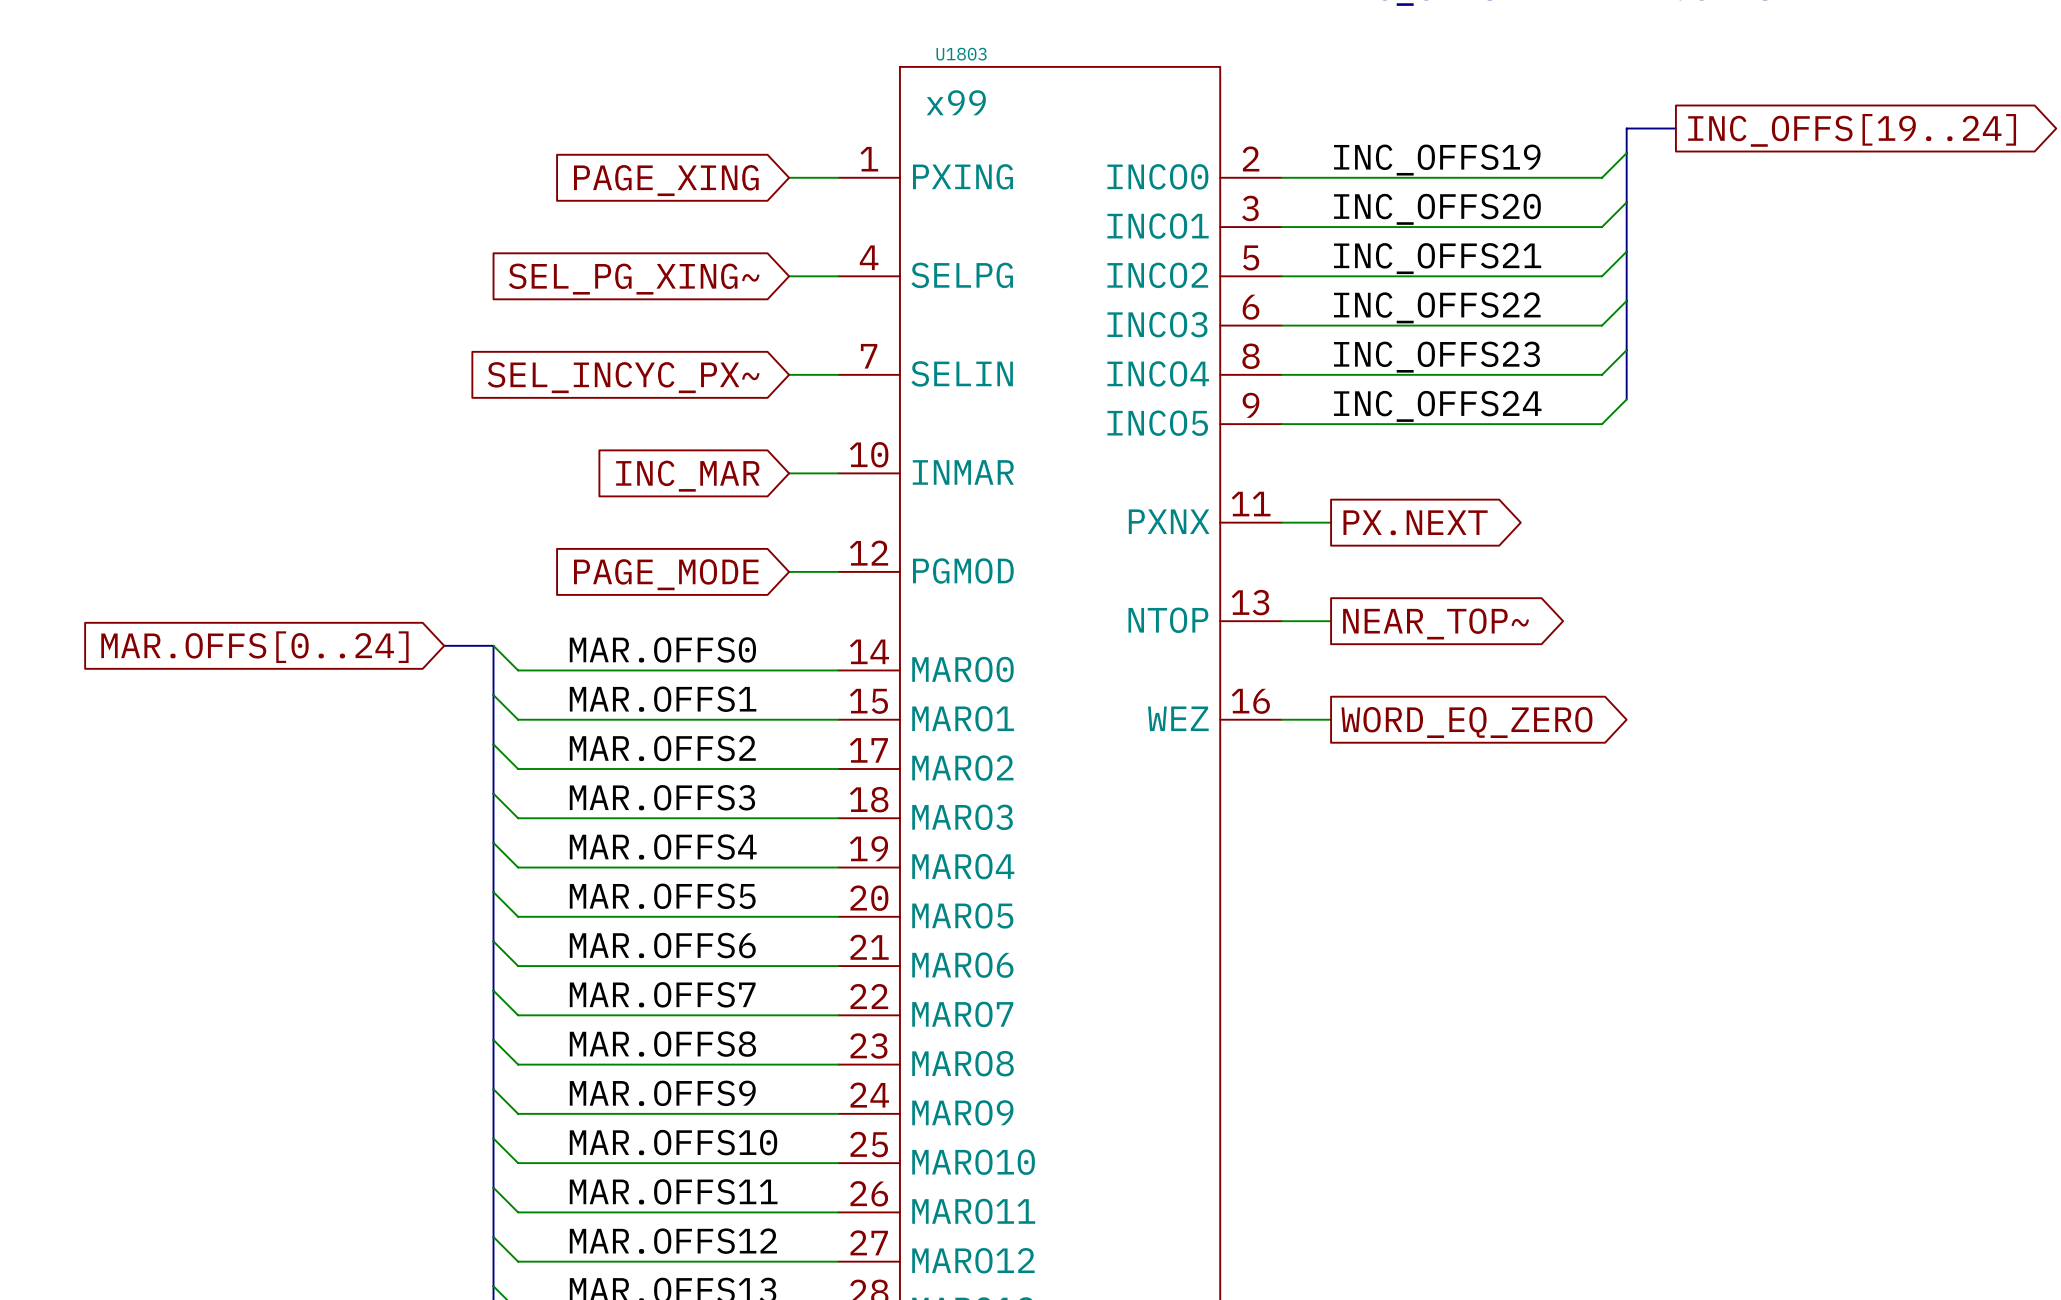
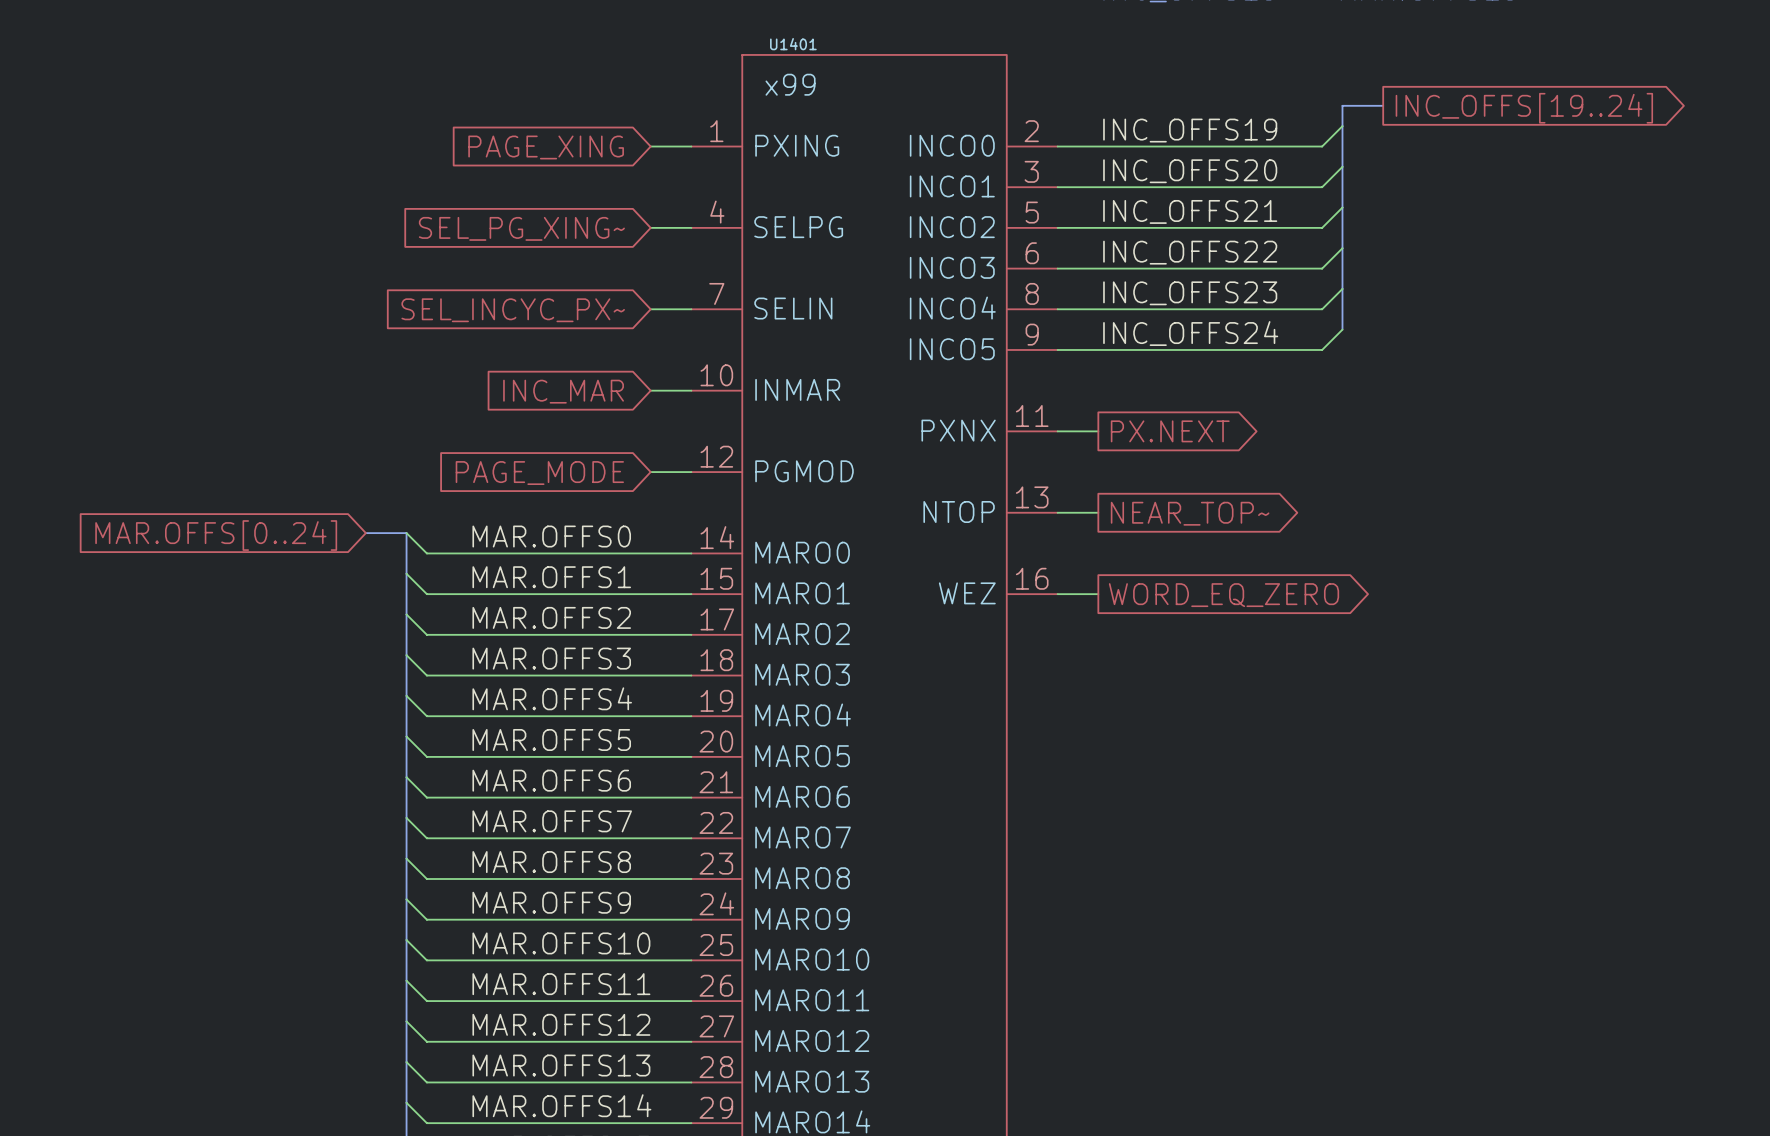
U1803 name: U1803 (961, 54) -> U1401 (793, 44)

